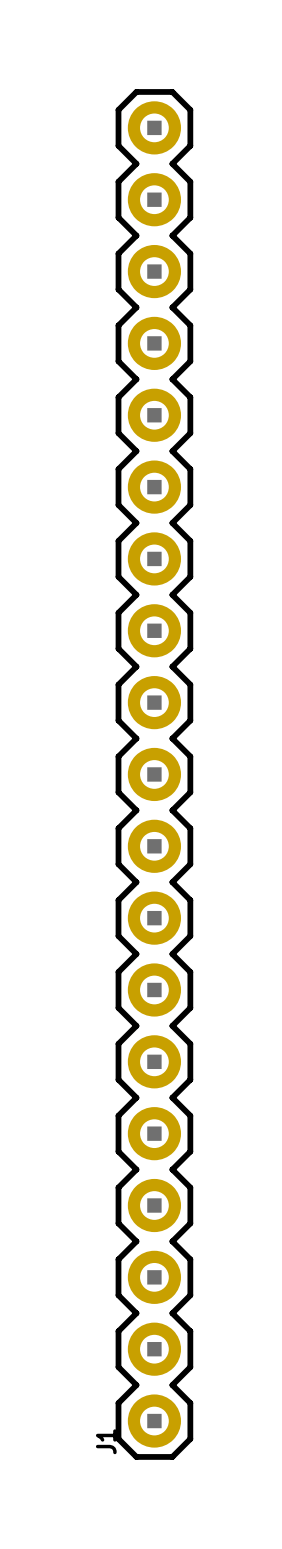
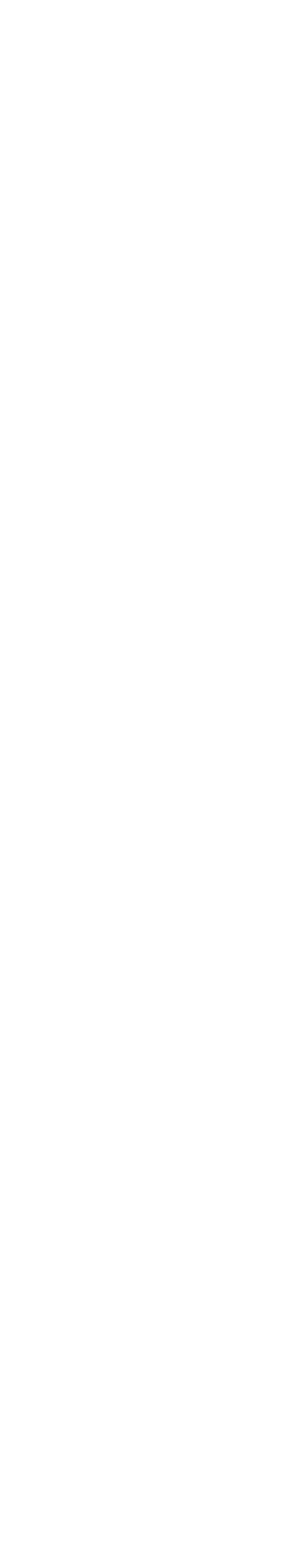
J1: (154, 774) -> none

